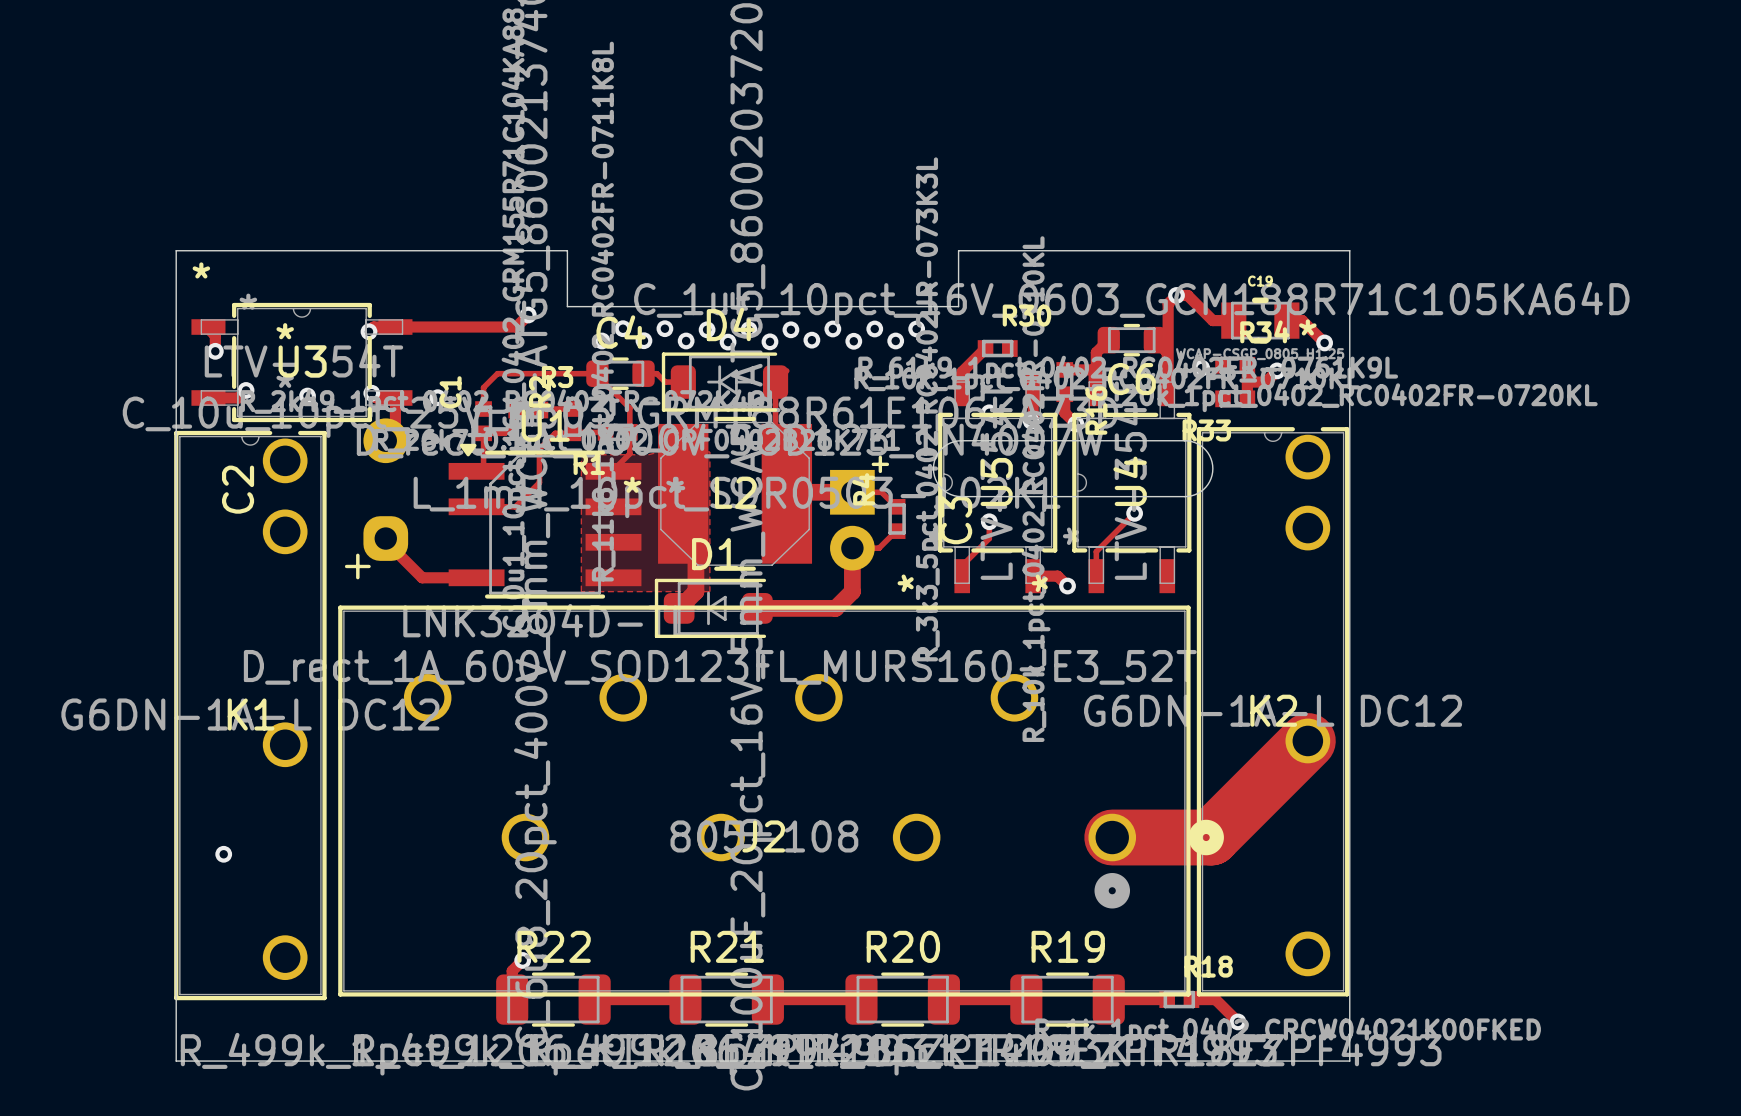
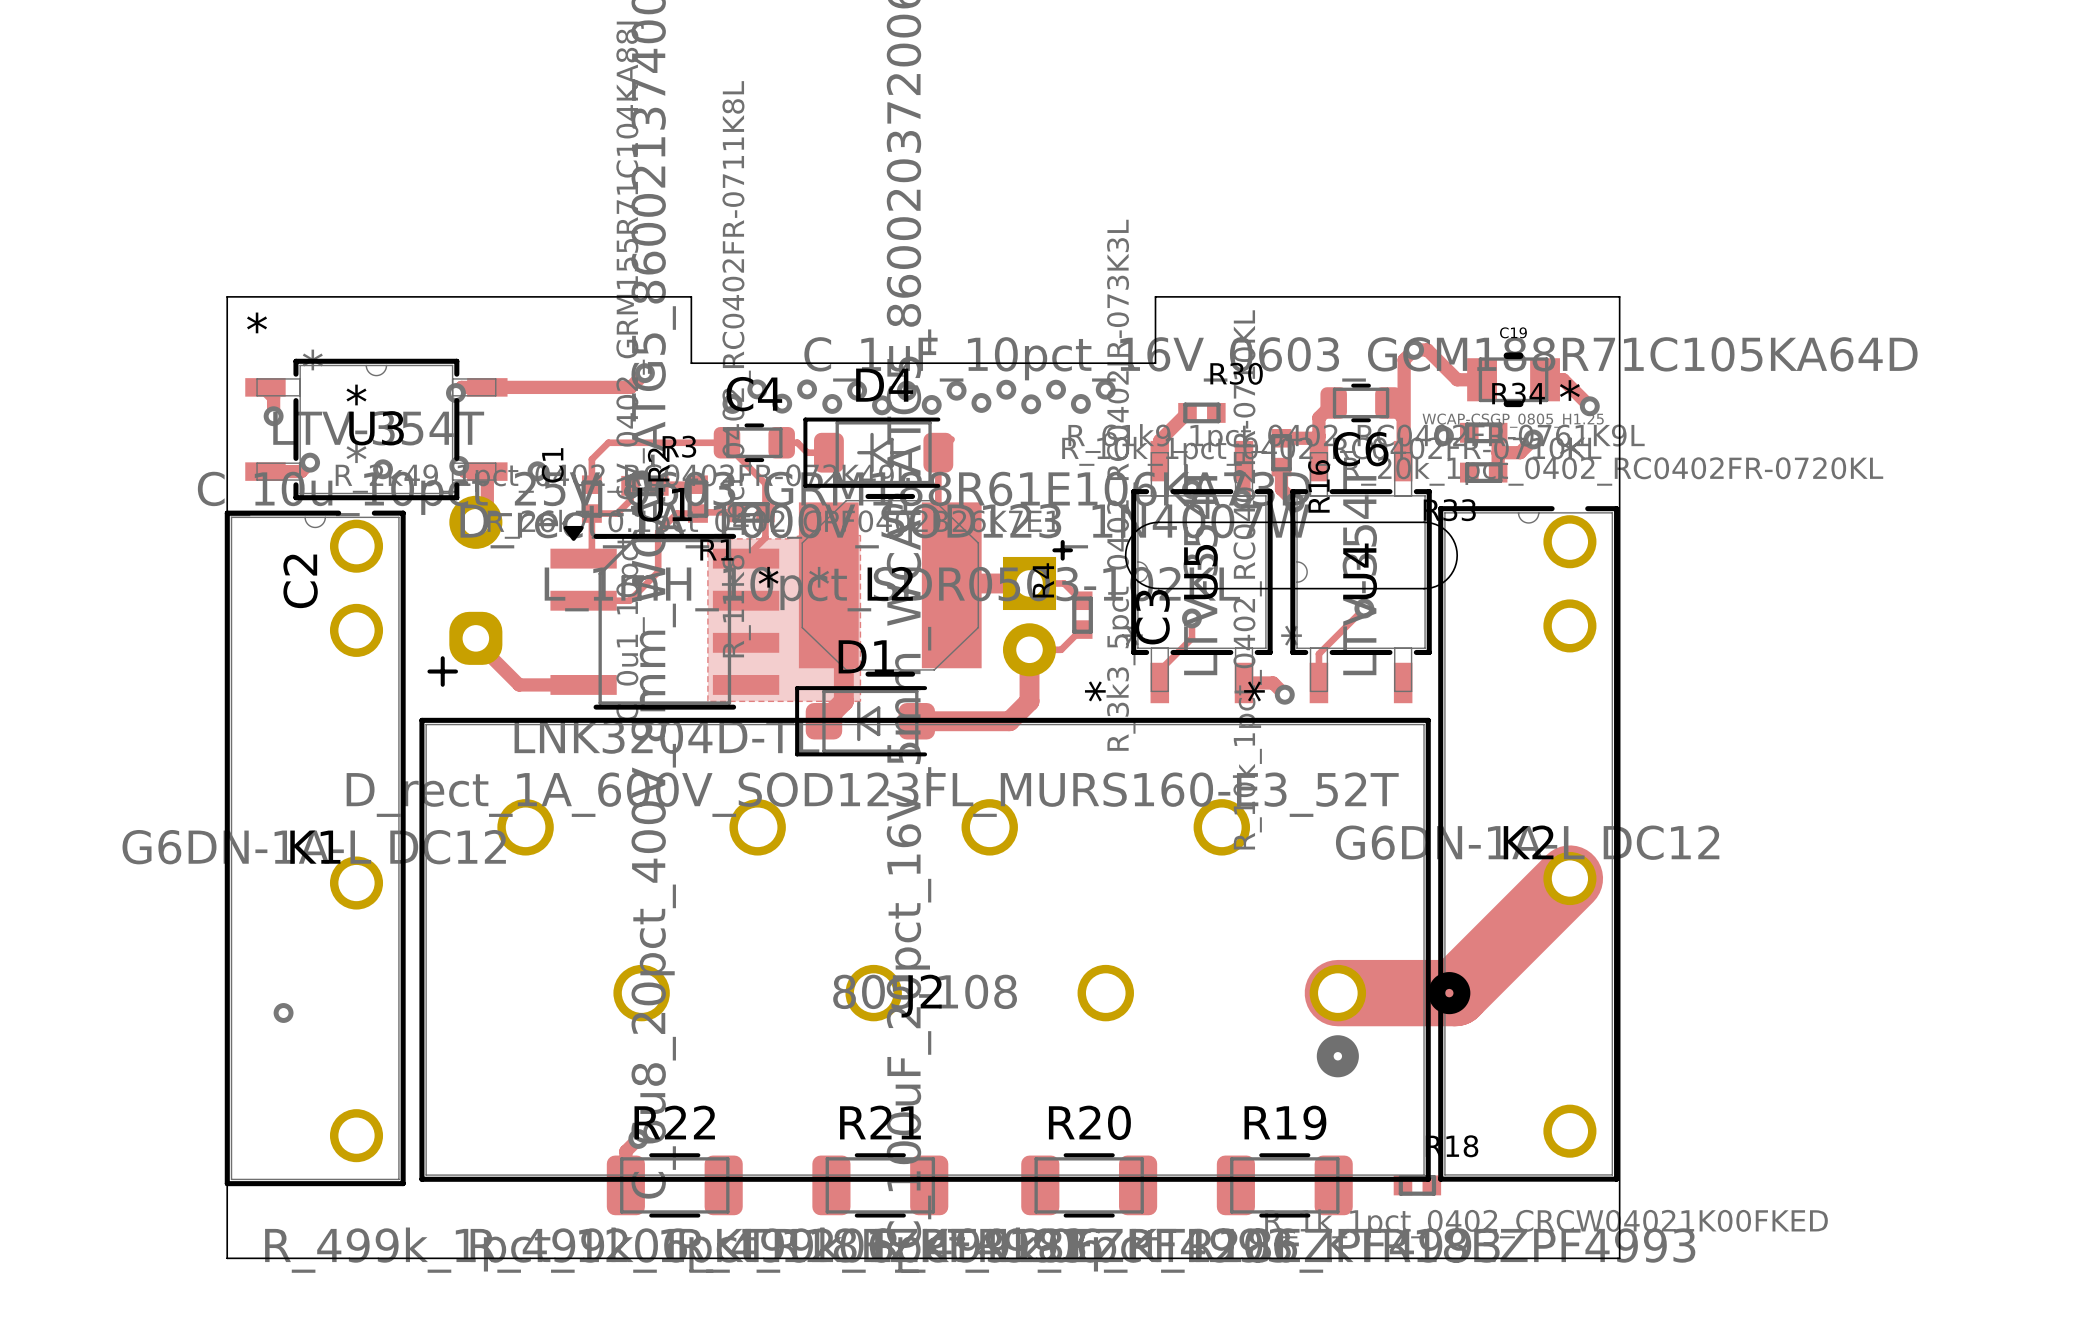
track: (594, 999) (685, 999) -> none
track: (767, 999) (861, 999) -> none
track: (943, 999) (1026, 999) -> none
track: (1108, 999) (1167, 999) -> none
track: (1191, 999) (1215, 999) (1237, 1021) -> none
via: (1237, 1021) -> none

